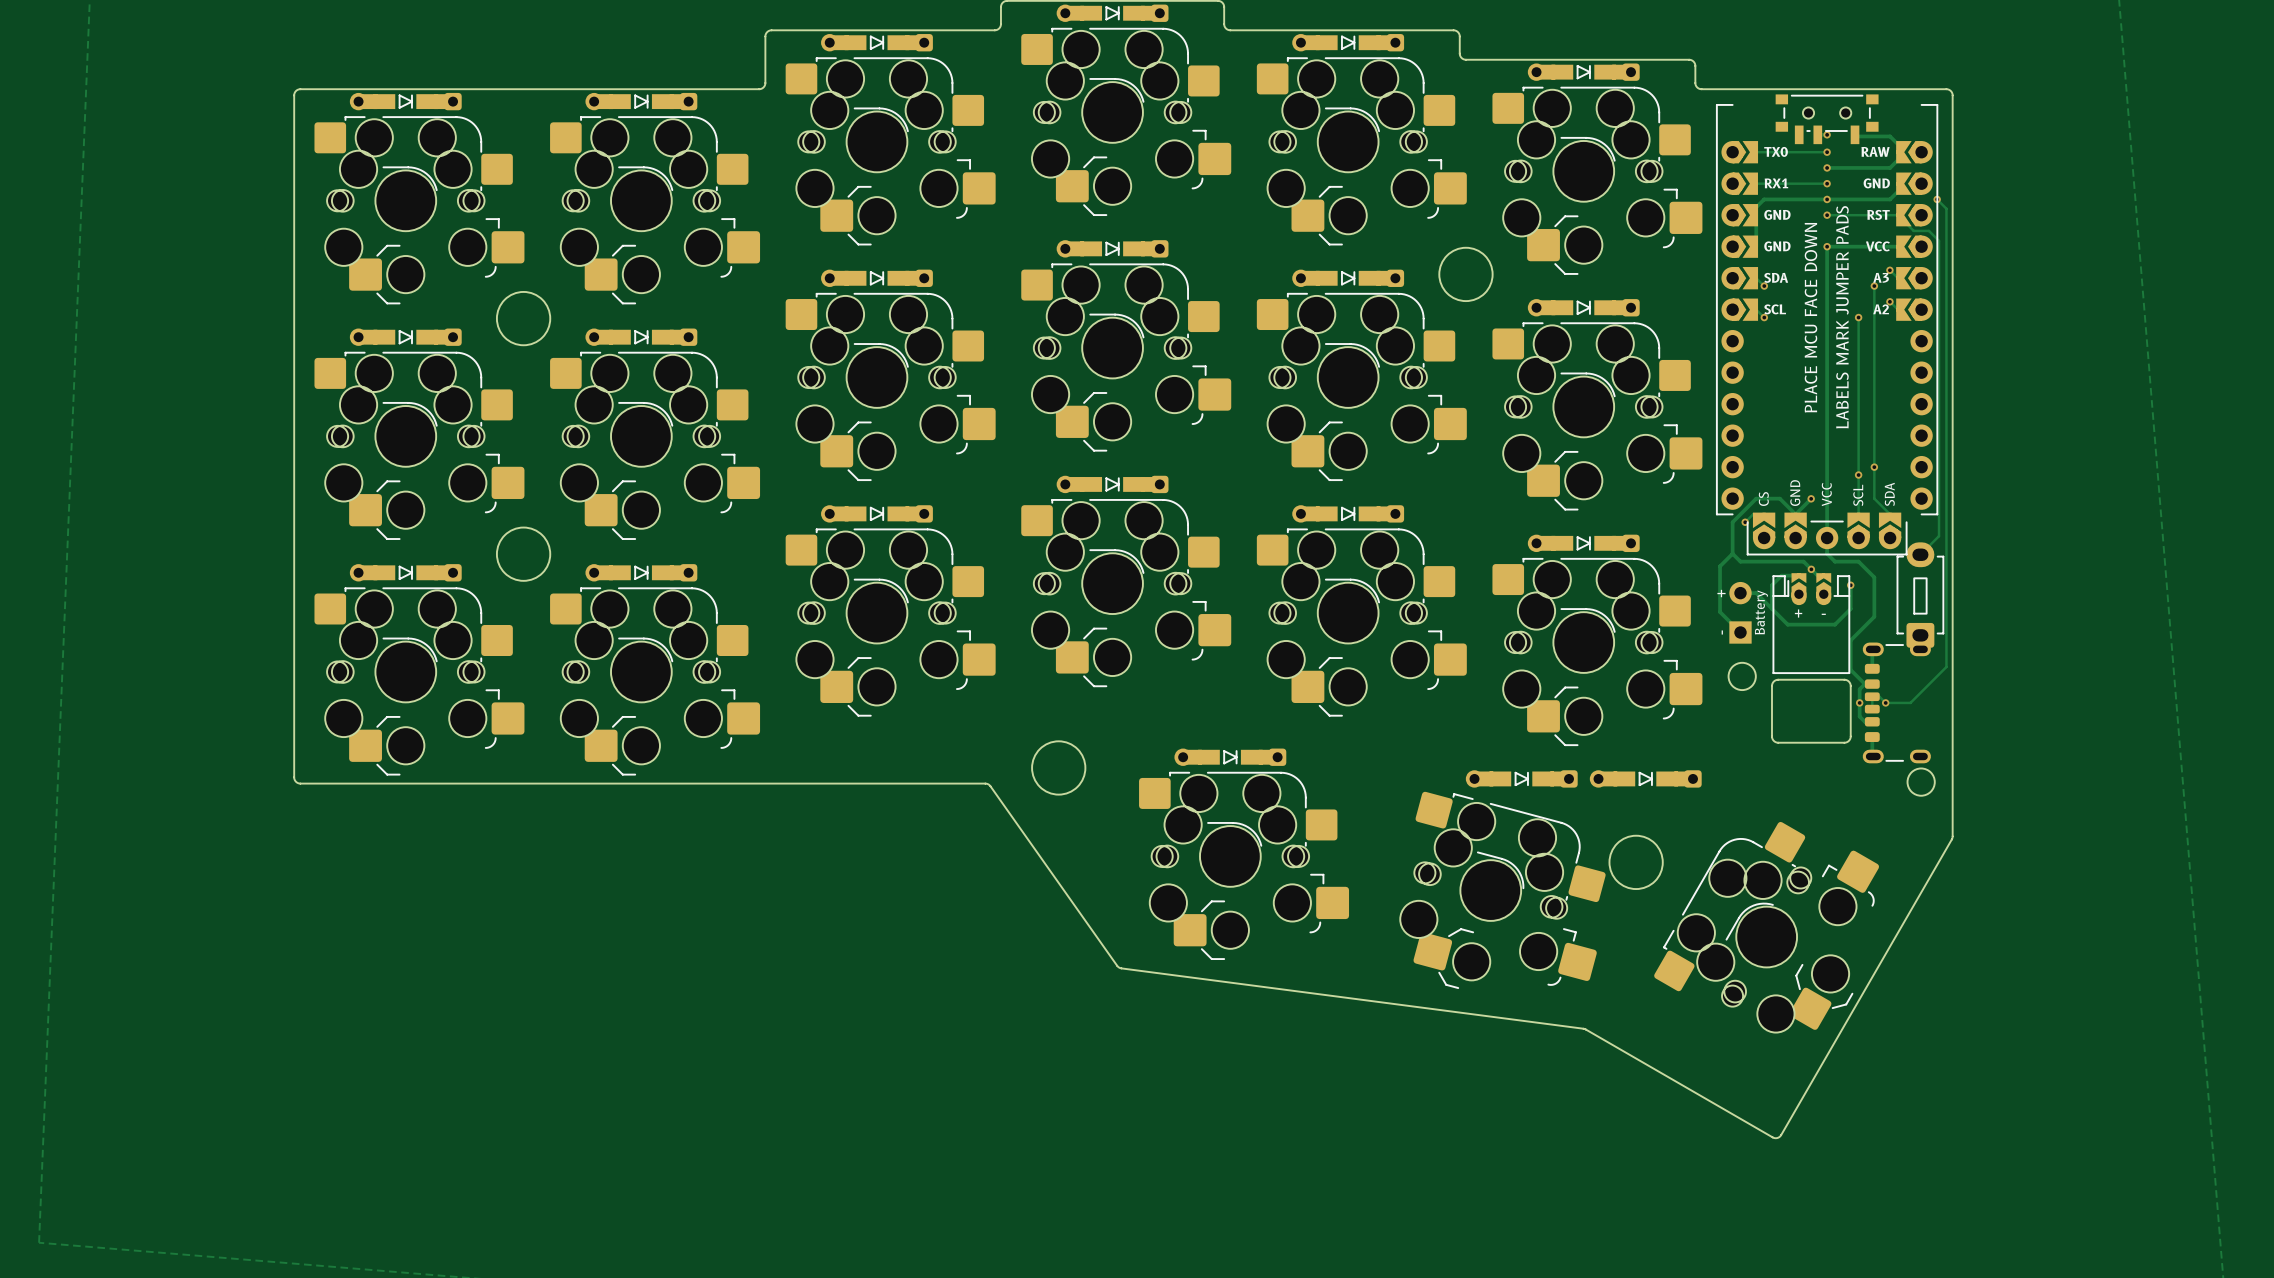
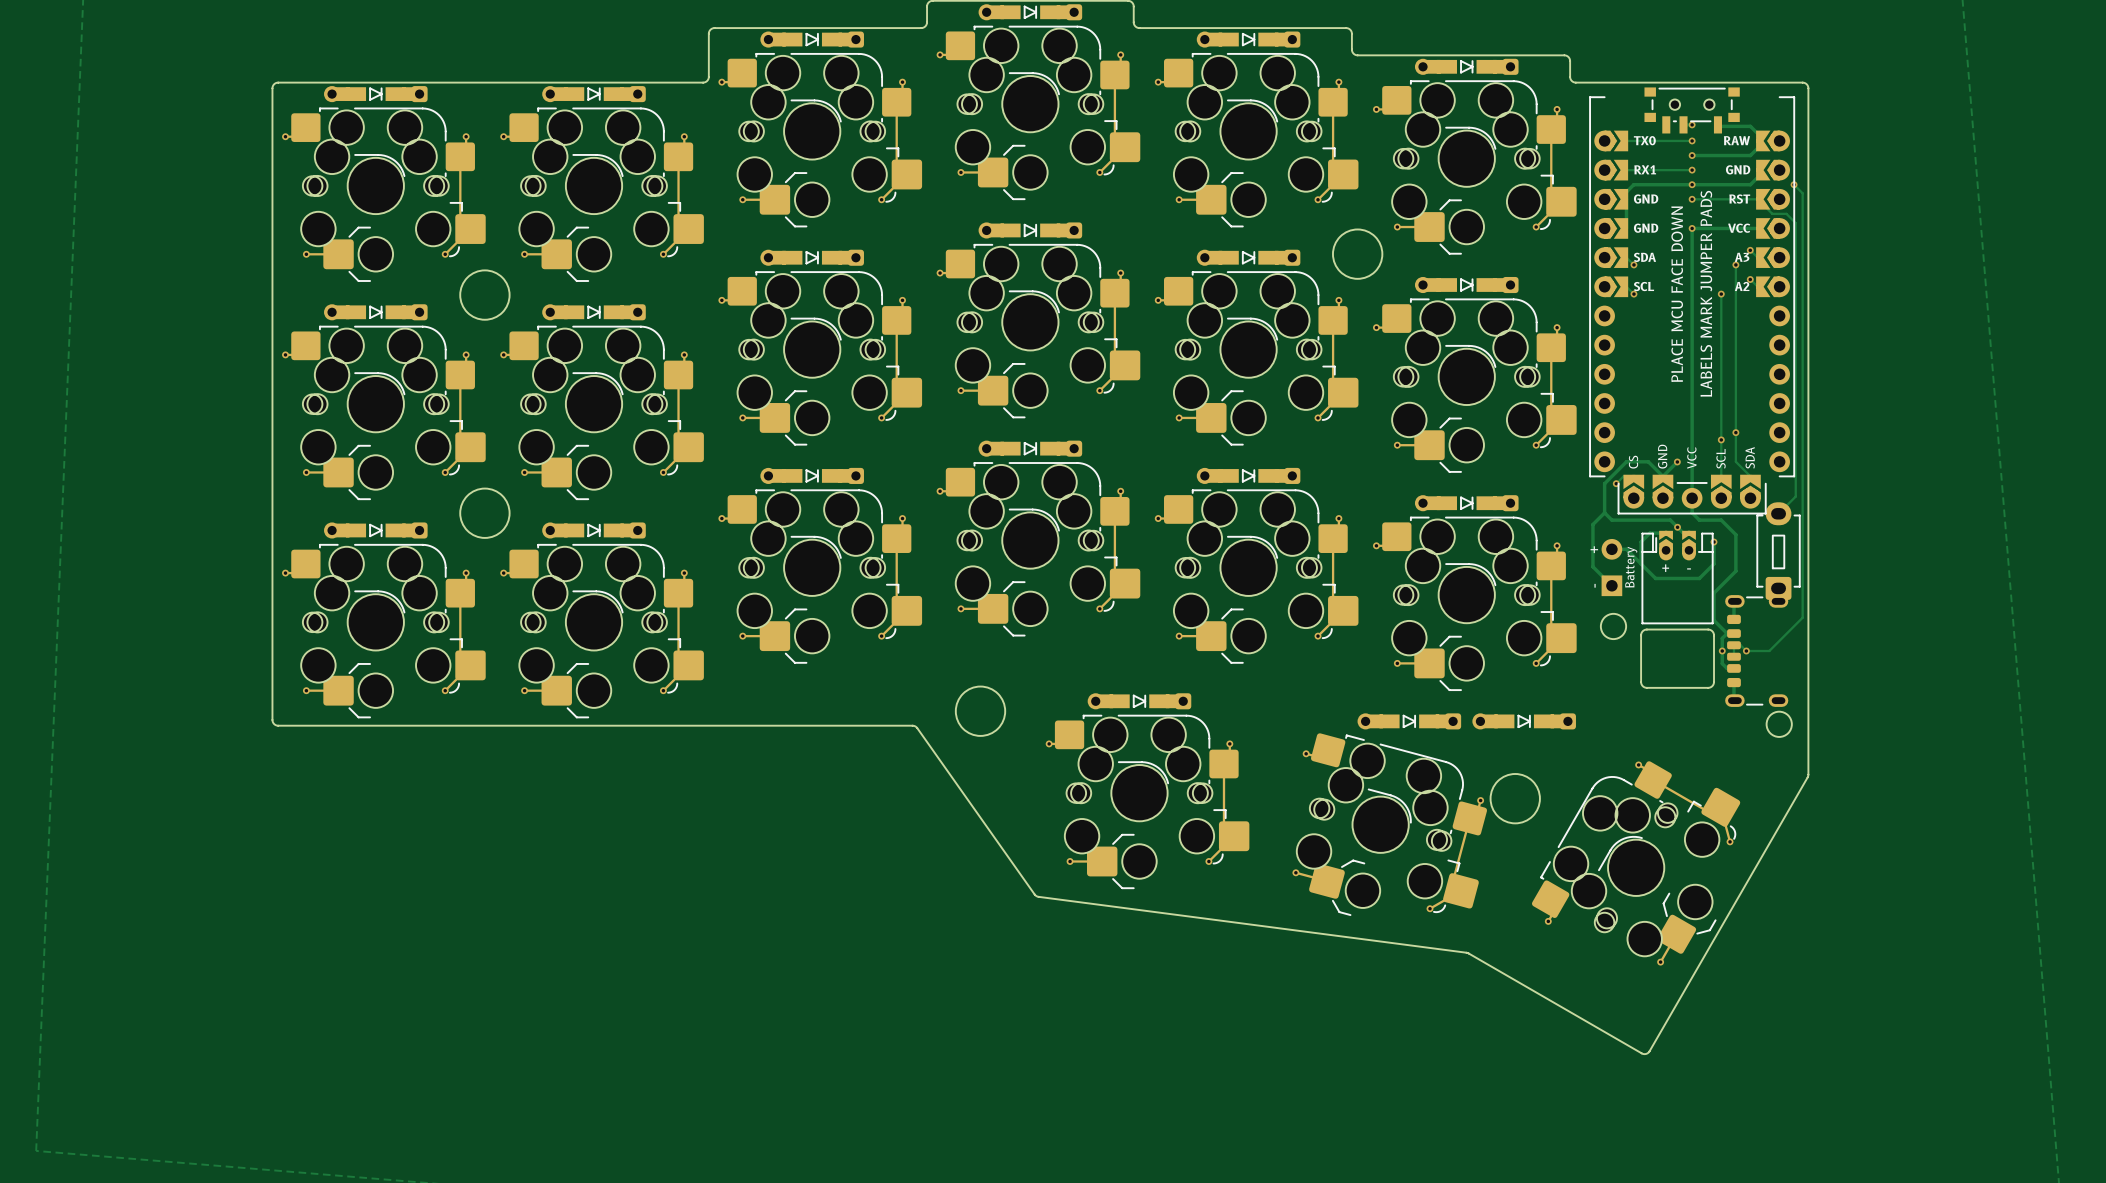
part footprint: [1021, 27, 1232, 216] -> [936, 25, 1141, 200]
part footprint: [785, 57, 996, 246] -> [718, 53, 923, 228]
part footprint: [1256, 57, 1467, 246] -> [1154, 53, 1359, 228]
part footprint: [1492, 86, 1703, 275] -> [1373, 80, 1577, 255]
part footprint: [314, 116, 525, 305] -> [282, 107, 486, 282]
part footprint: [550, 116, 761, 305] -> [500, 107, 704, 282]
part footprint: [1021, 263, 1232, 452] -> [936, 243, 1141, 419]
part footprint: [785, 292, 996, 481] -> [718, 271, 923, 446]
part footprint: [1256, 292, 1467, 481] -> [1154, 271, 1359, 446]
part footprint: [1492, 322, 1703, 511] -> [1373, 298, 1577, 473]
part footprint: [314, 351, 525, 540] -> [282, 325, 486, 500]
part footprint: [550, 351, 761, 540] -> [500, 325, 704, 500]
part footprint: [1021, 499, 1232, 687] -> [936, 462, 1141, 637]
part footprint: [785, 528, 996, 717] -> [718, 489, 923, 664]
part footprint: [1256, 528, 1467, 717] -> [1154, 489, 1359, 664]
part footprint: [1492, 557, 1703, 746] -> [1373, 516, 1577, 691]
part footprint: [314, 587, 525, 776] -> [282, 543, 486, 719]
part footprint: [550, 587, 761, 776] -> [500, 543, 704, 719]
part footprint: [1139, 771, 1350, 960] -> [1045, 714, 1250, 889]
part footprint: [1400, 791, 1606, 989] -> [1292, 733, 1488, 916]
part footprint: [1654, 821, 1880, 1033] -> [1531, 761, 1741, 966]

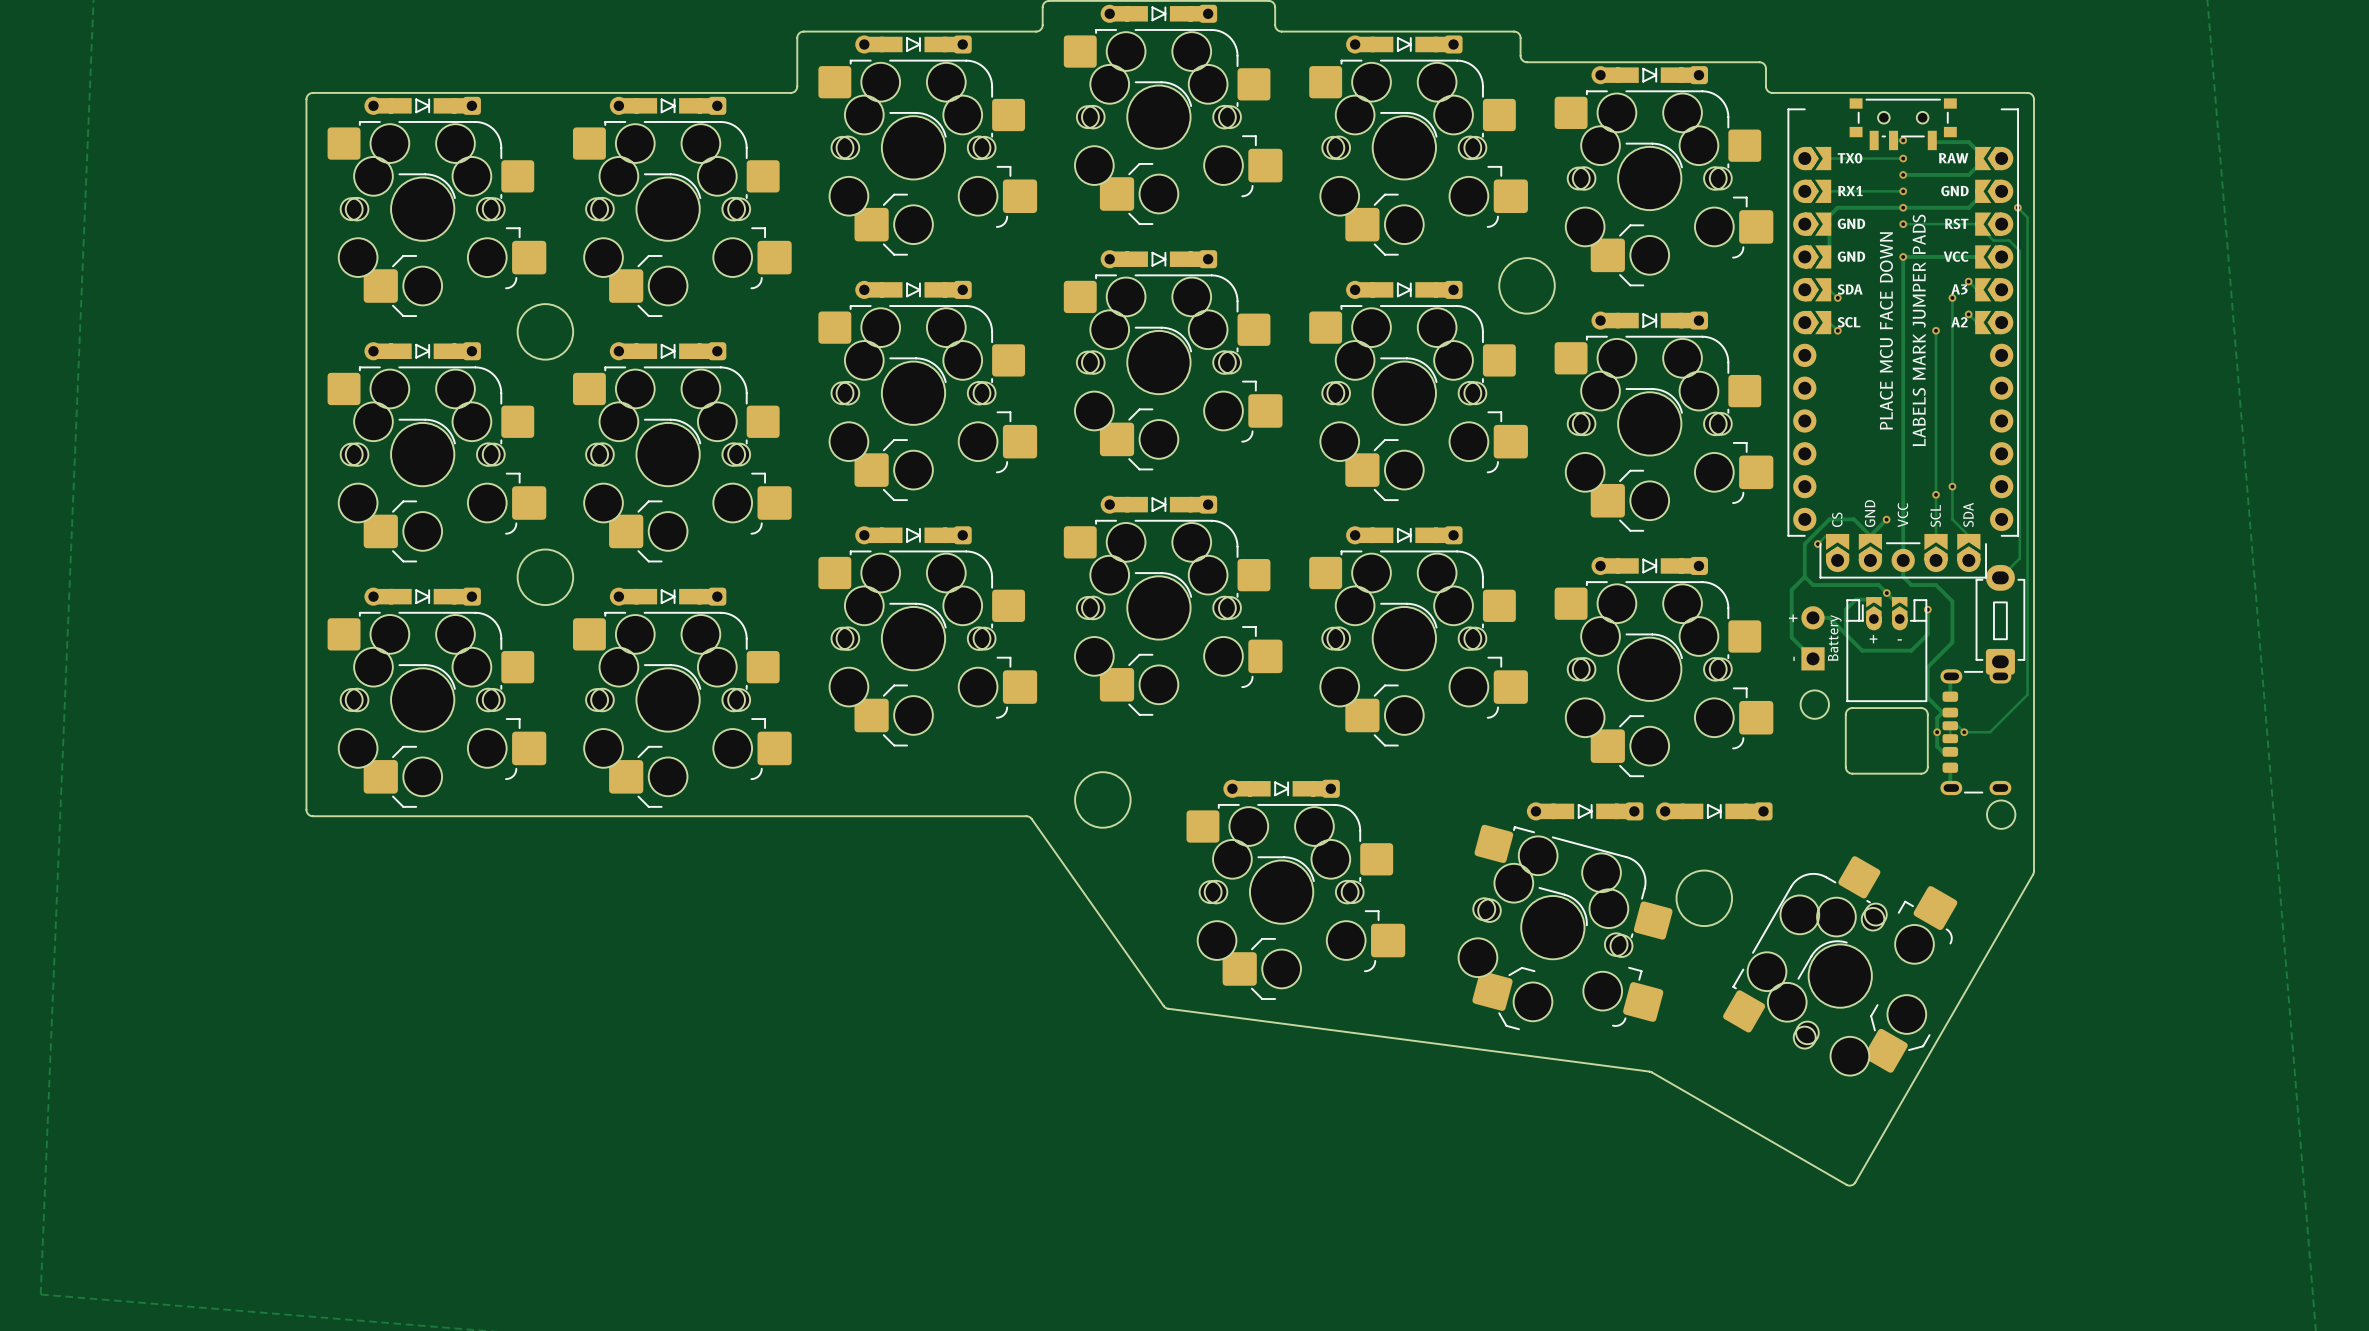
part footprint: [936, 25, 1141, 200] -> [1063, 28, 1283, 225]
part footprint: [718, 53, 923, 228] -> [818, 59, 1038, 256]
part footprint: [1154, 53, 1359, 228] -> [1309, 59, 1528, 256]
part footprint: [1373, 80, 1577, 255] -> [1554, 90, 1774, 287]
part footprint: [282, 107, 486, 282] -> [327, 121, 547, 317]
part footprint: [500, 107, 704, 282] -> [572, 121, 792, 317]
part footprint: [936, 243, 1141, 419] -> [1063, 274, 1283, 471]
part footprint: [718, 271, 923, 446] -> [818, 305, 1038, 501]
part footprint: [1154, 271, 1359, 446] -> [1309, 305, 1528, 501]
part footprint: [1373, 298, 1577, 473] -> [1554, 335, 1774, 532]
part footprint: [282, 325, 486, 500] -> [327, 366, 547, 563]
part footprint: [500, 325, 704, 500] -> [572, 366, 792, 563]
part footprint: [936, 462, 1141, 637] -> [1063, 519, 1283, 716]
part footprint: [718, 489, 923, 664] -> [818, 550, 1038, 747]
part footprint: [1154, 489, 1359, 664] -> [1309, 550, 1528, 747]
part footprint: [1373, 516, 1577, 691] -> [1554, 581, 1774, 777]
part footprint: [282, 543, 486, 719] -> [327, 611, 547, 808]
part footprint: [500, 543, 704, 719] -> [572, 611, 792, 808]
part footprint: [1045, 714, 1250, 889] -> [1186, 803, 1406, 1000]
part footprint: [1292, 733, 1488, 916] -> [1458, 824, 1673, 1030]
part footprint: [1531, 761, 1741, 966] -> [1723, 856, 1958, 1076]

